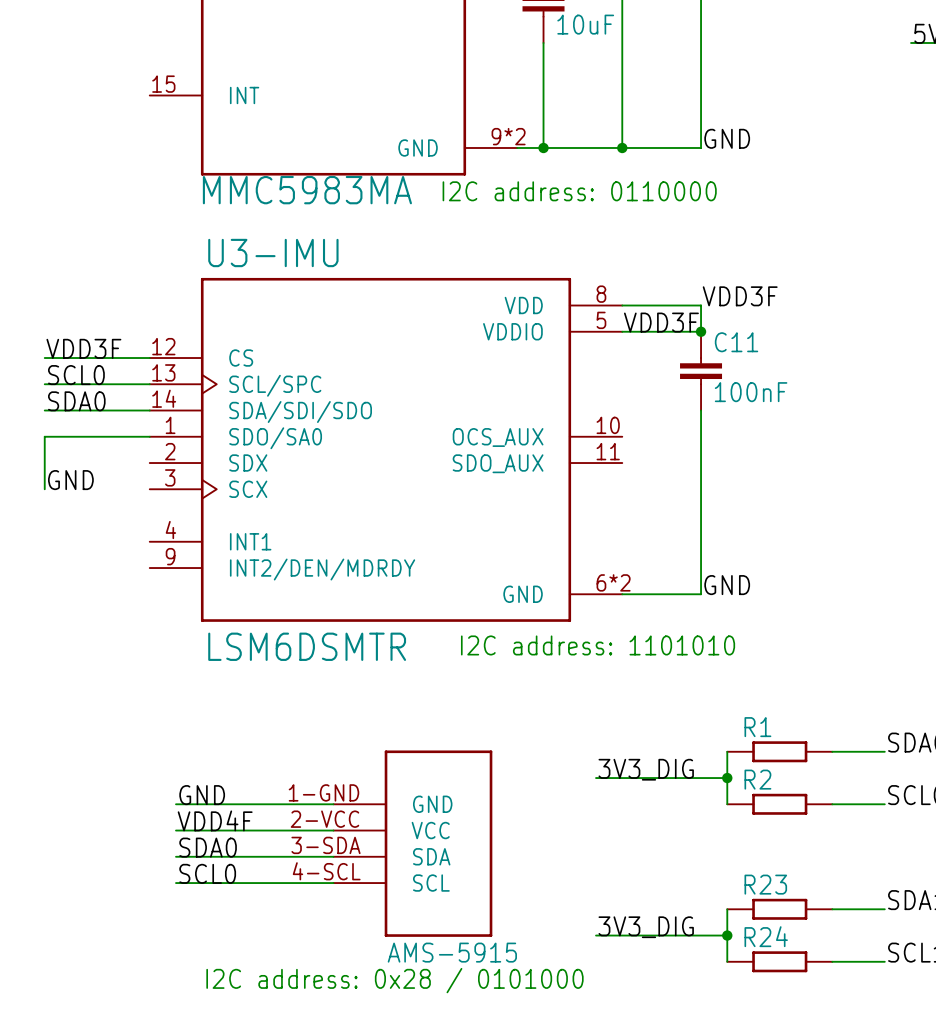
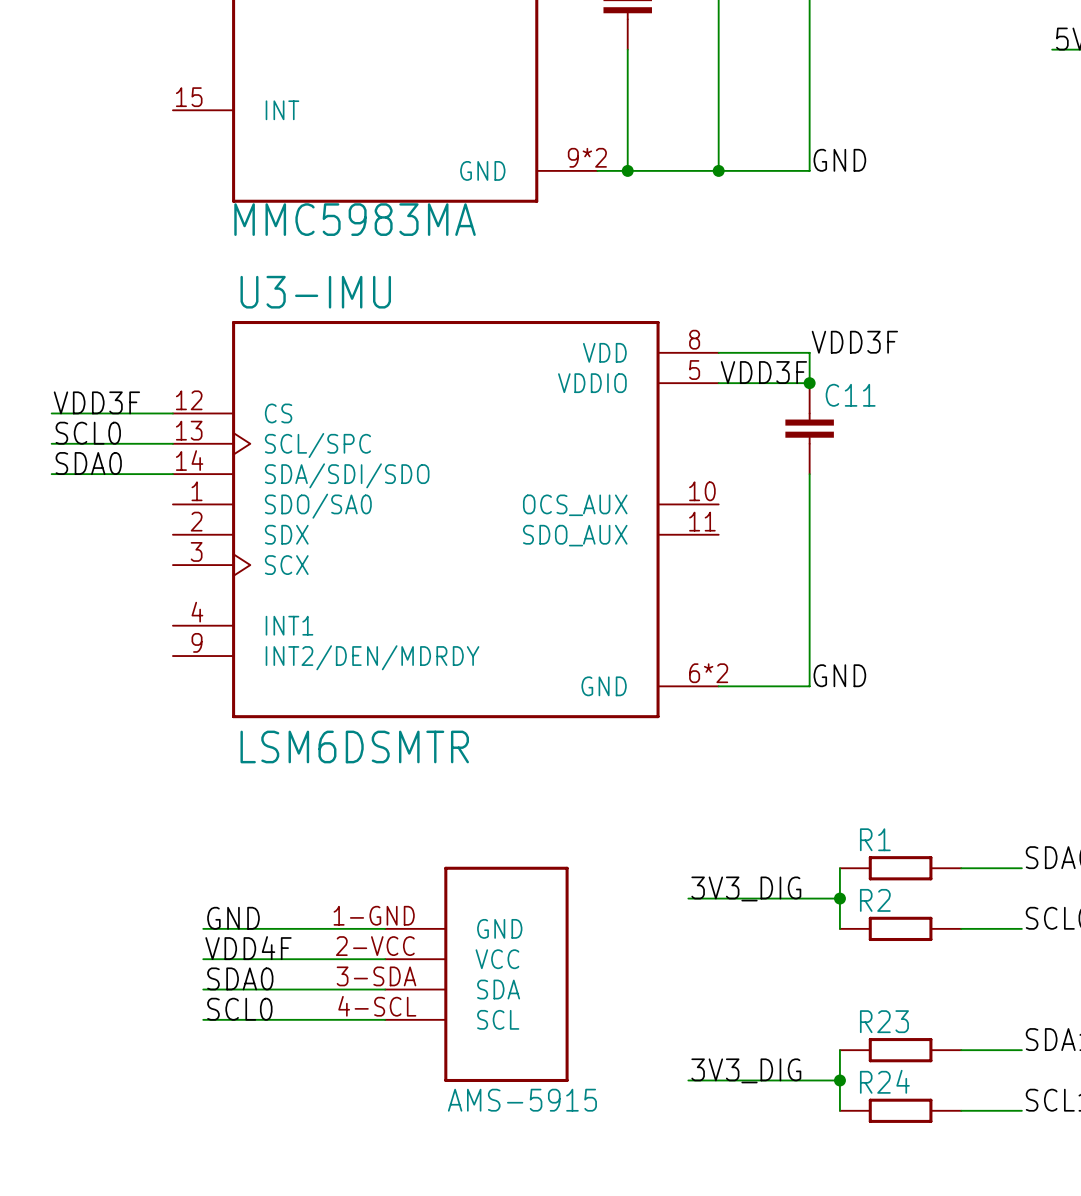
part value: 10uF (585, 24) -> none
text: I2C address: 0110000 (579, 191) -> none
C11 value: 100nF (751, 392) -> none
wire: (149, 436) (44, 436) (44, 489) -> none
label: GND (70, 480) -> none
text: I2C address: 1101010 (598, 645) -> none
text: I2C address: 0x28 / 0101000 (394, 980) -> none

